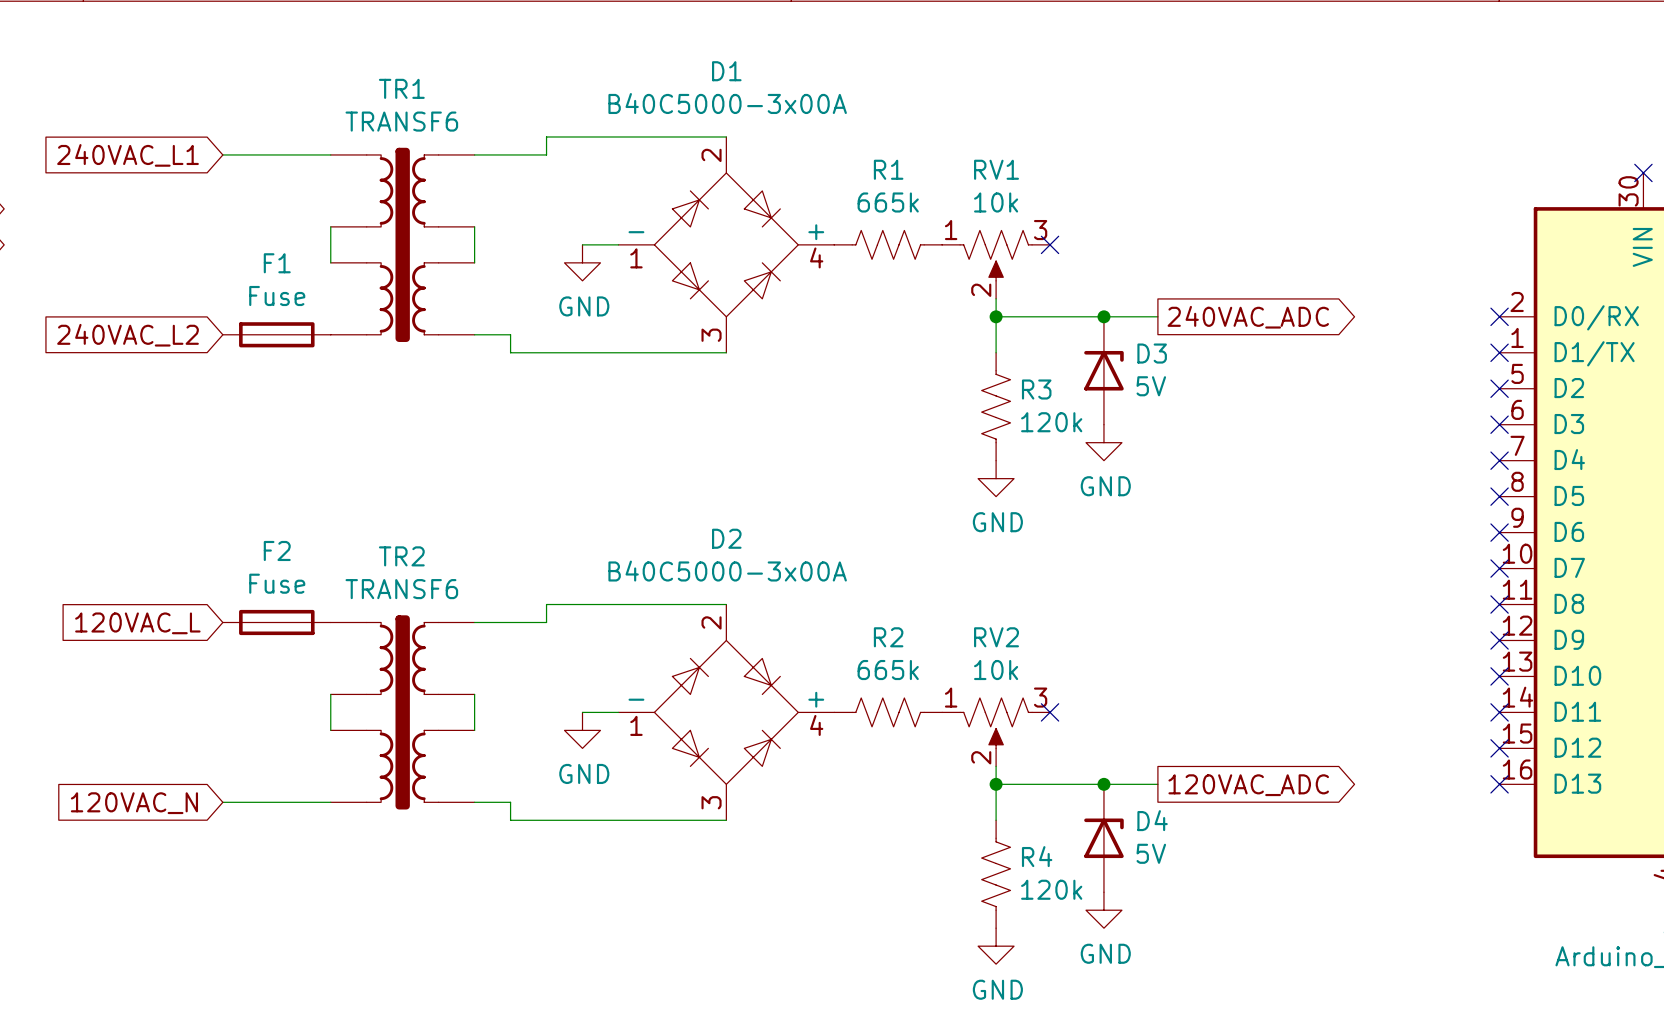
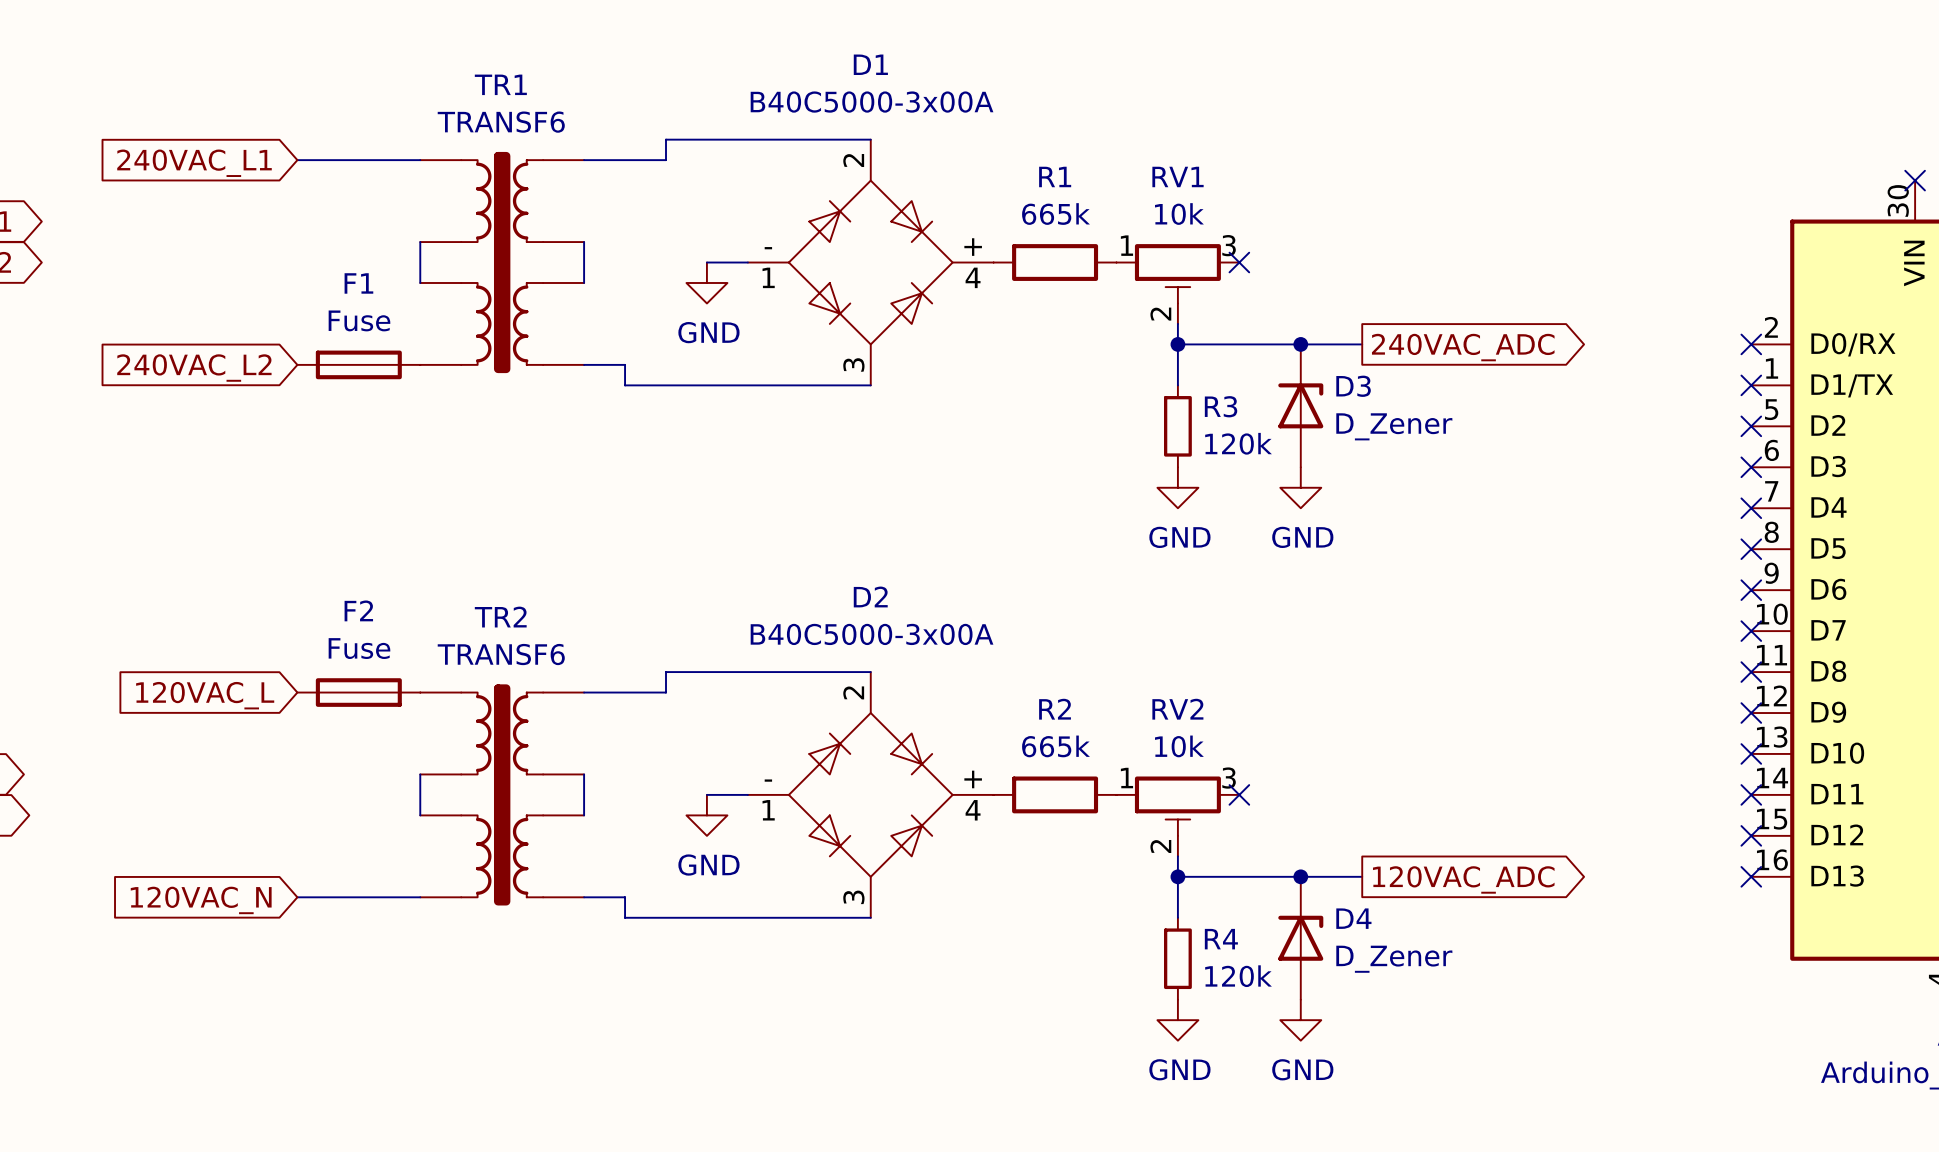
R1 symbol: [834, 230, 943, 260] -> [993, 244, 1117, 281]
RV1 symbol: [942, 230, 1051, 299] -> [1116, 244, 1240, 324]
R3 symbol: [981, 352, 1011, 461] -> [1164, 385, 1192, 468]
D3 value: 5V (1151, 386) -> D_Zener (1394, 426)
power symbol position: GND (996, 478) -> GND (1177, 487)
R2 symbol: [834, 698, 943, 727] -> [993, 776, 1117, 814]
RV2 symbol: [942, 698, 1051, 767] -> [1116, 776, 1240, 857]
R4 symbol: [981, 820, 1011, 929] -> [1164, 917, 1192, 1000]
D4 value: 5V (1151, 853) -> D_Zener (1394, 959)
power symbol position: GND (996, 946) -> GND (1177, 1020)

